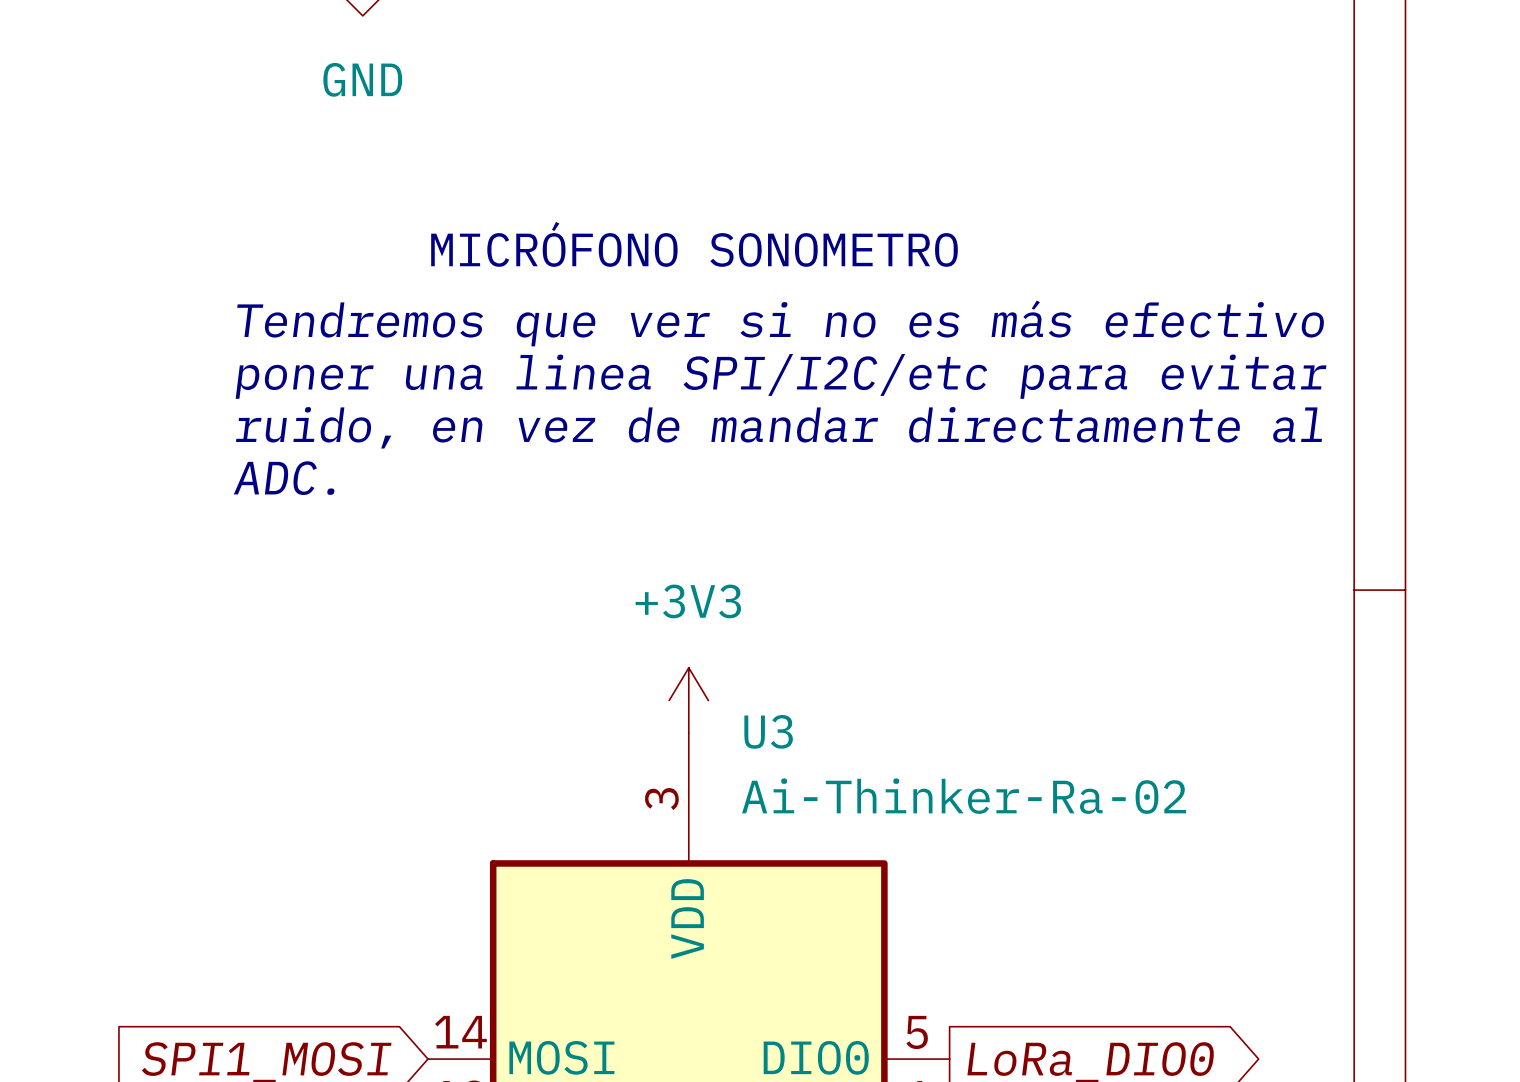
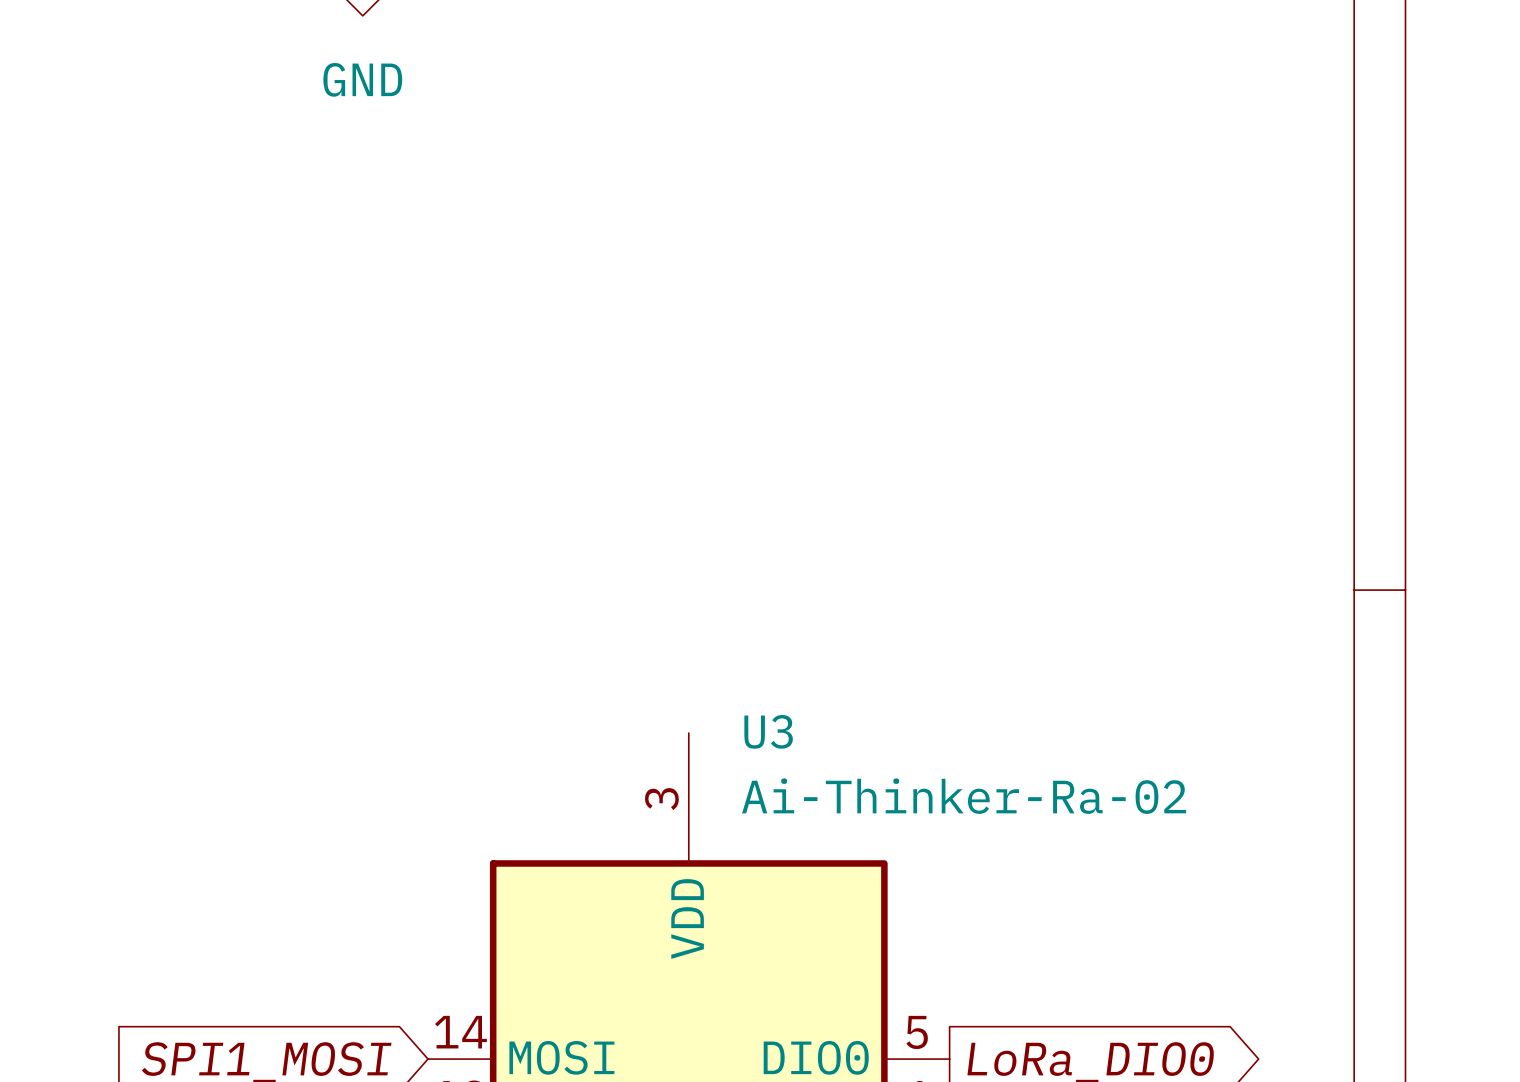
text: MICRÓFONO SONOMETRO (694, 244) -> none
text: Tendremos que ver si no es más efectivo (780, 323) -> none
text: poner una linea SPI/I2C/etc para evitar (781, 376) -> none
text: ruido, en vez de mandar directamente al (778, 427) -> none
text: ADC. (284, 478) -> none
power symbol: +3V3 (688, 700) -> none

